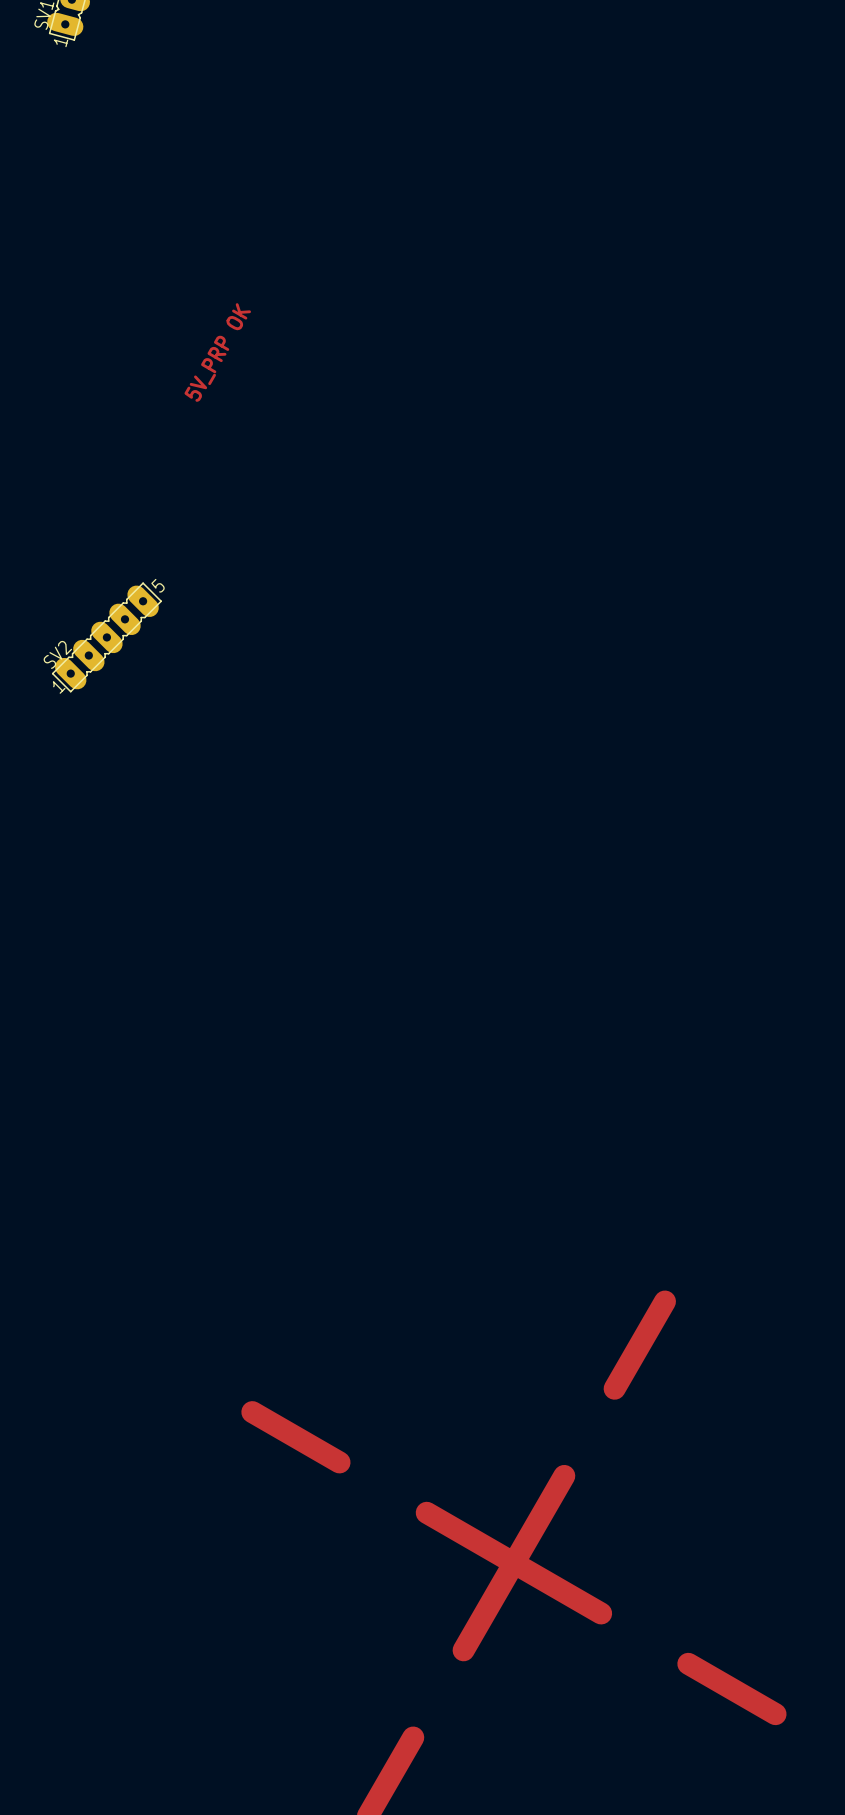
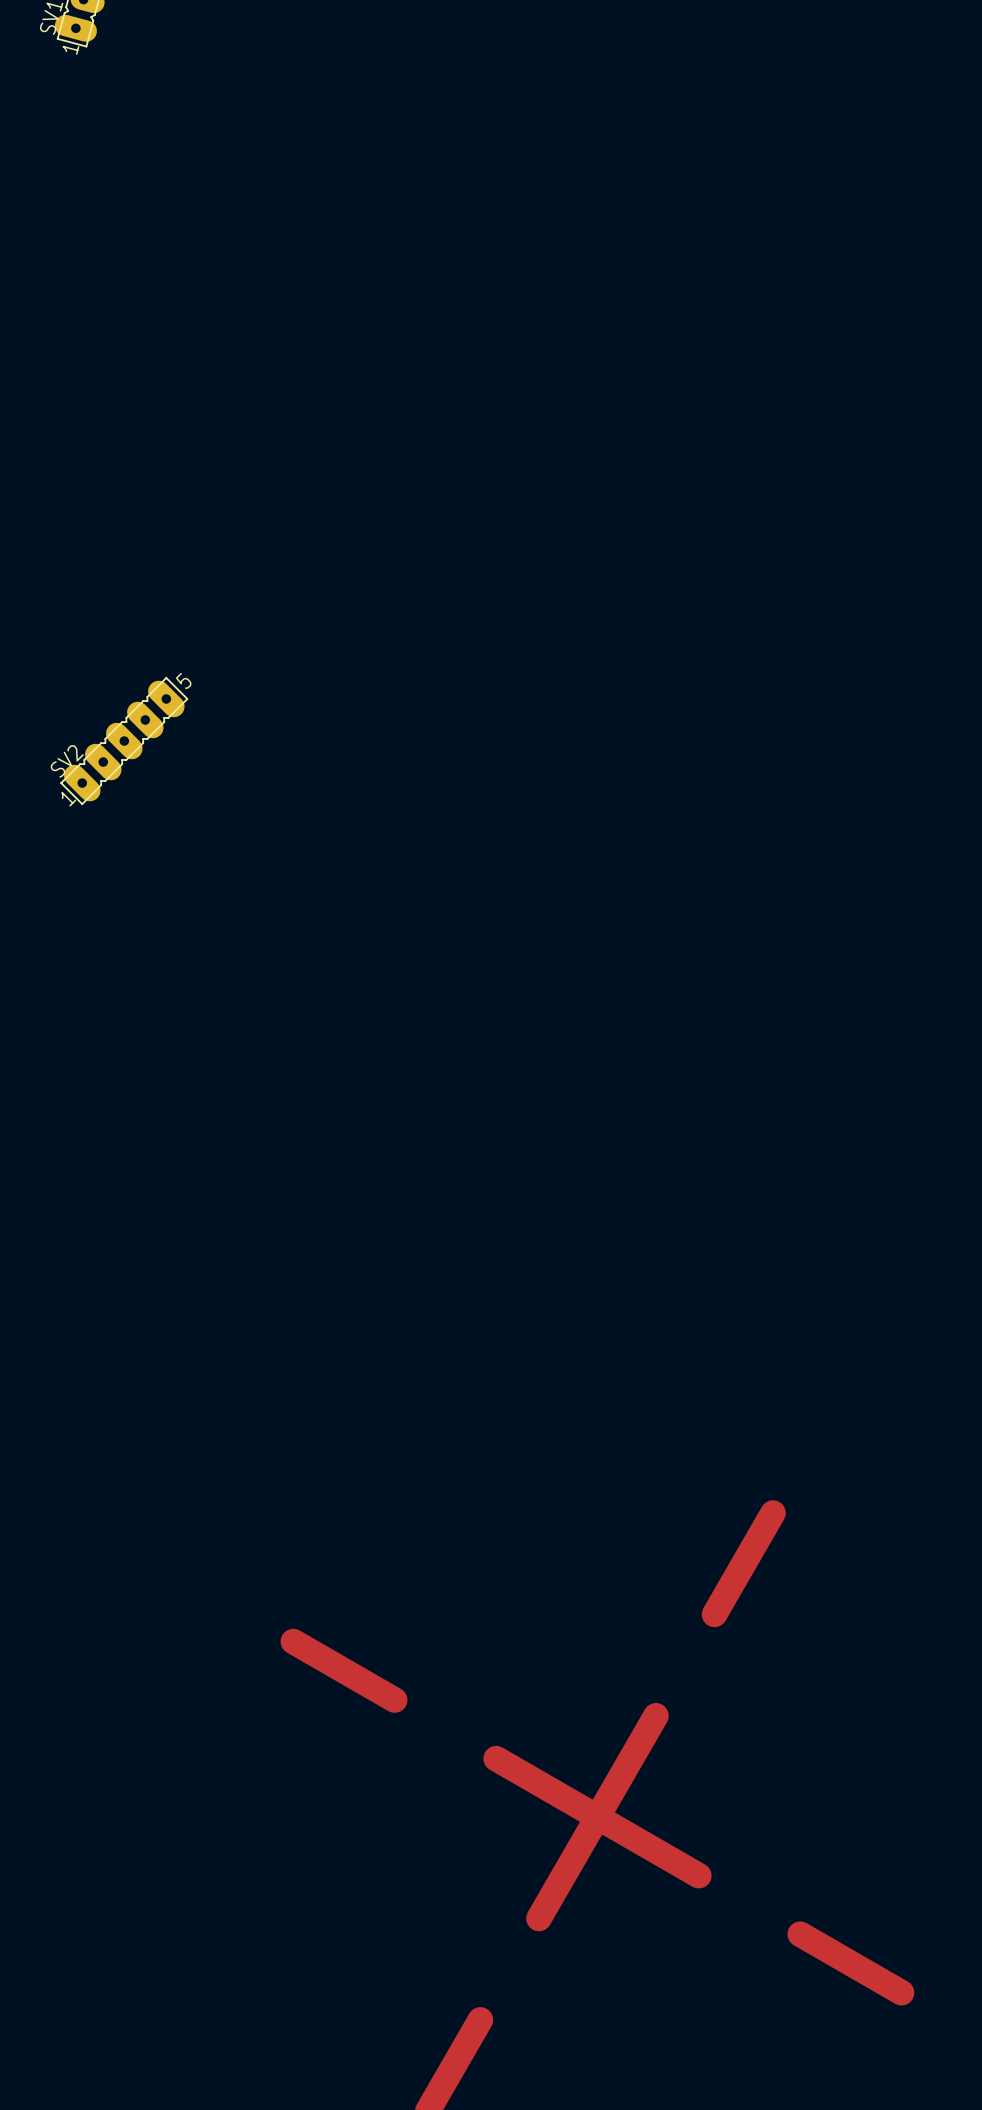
text: 5V_PRP OK (217, 352) -> none

